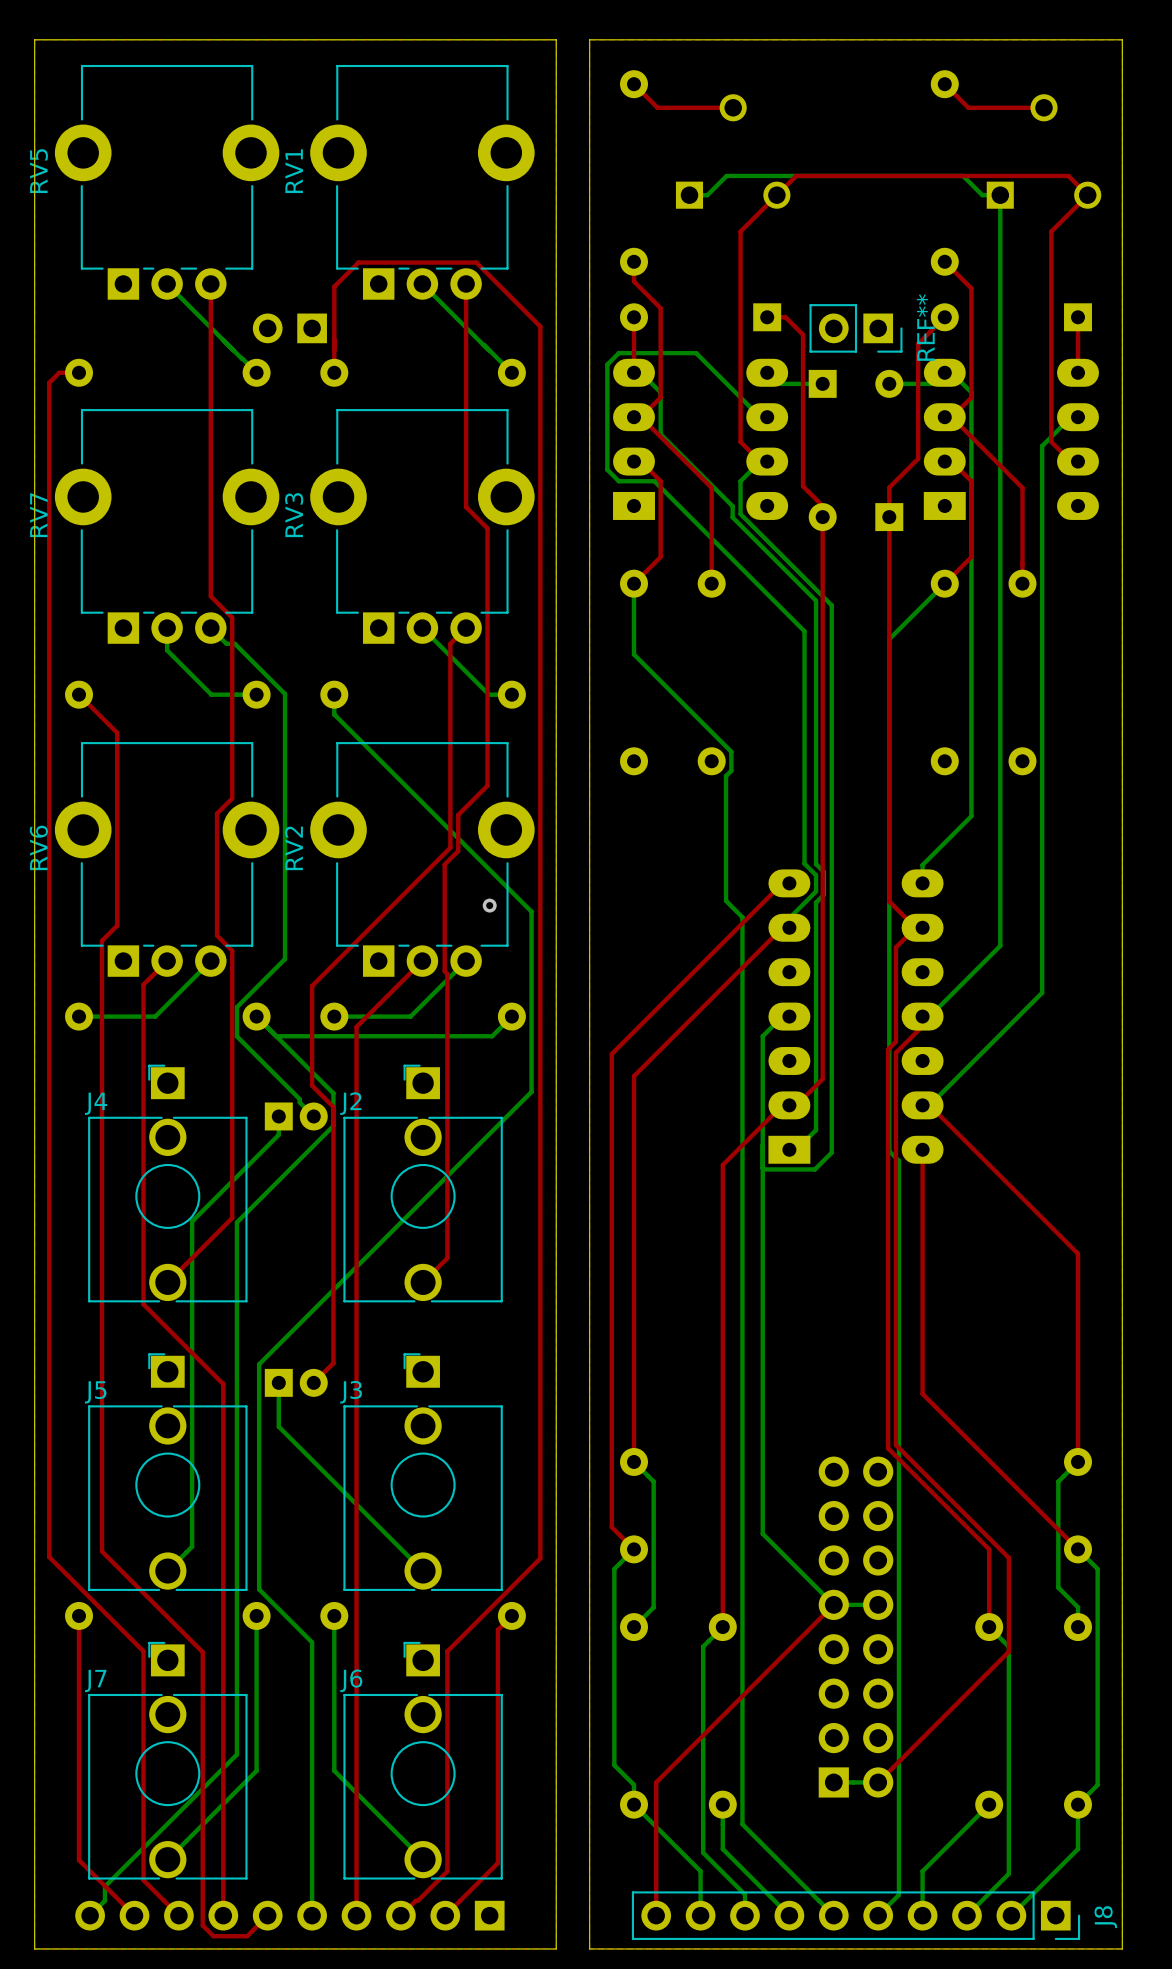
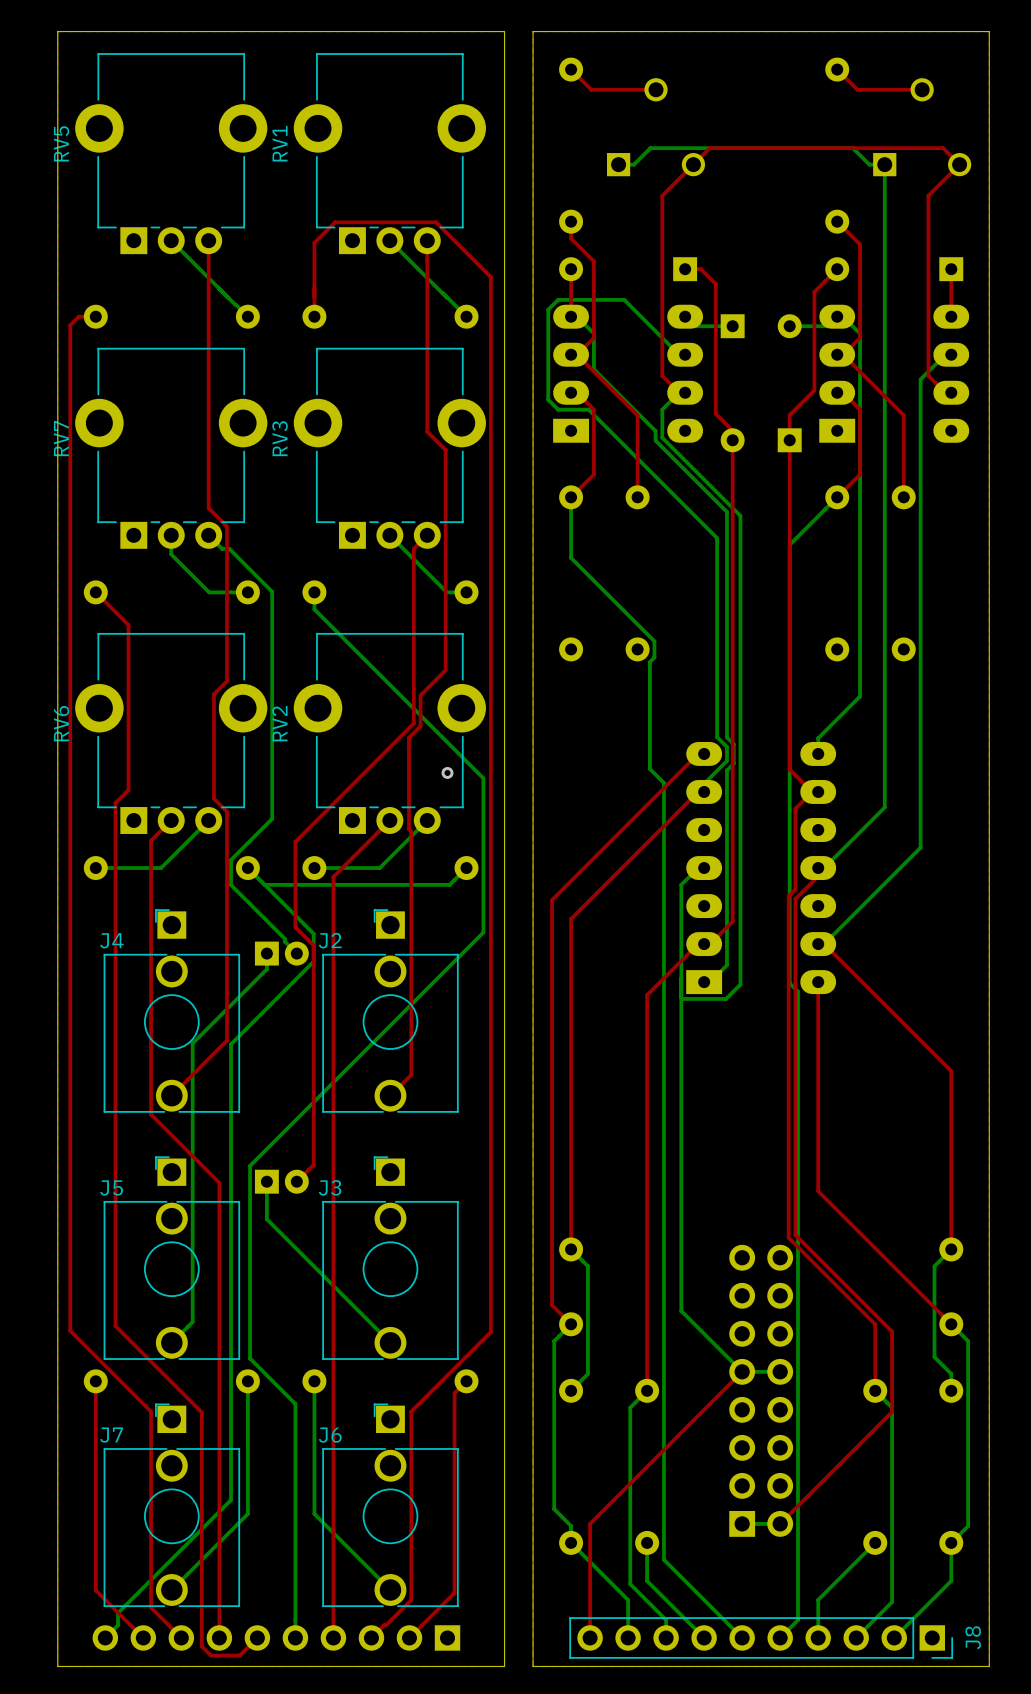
part: (289, 328) -> none
REF**: (855, 328) -> none

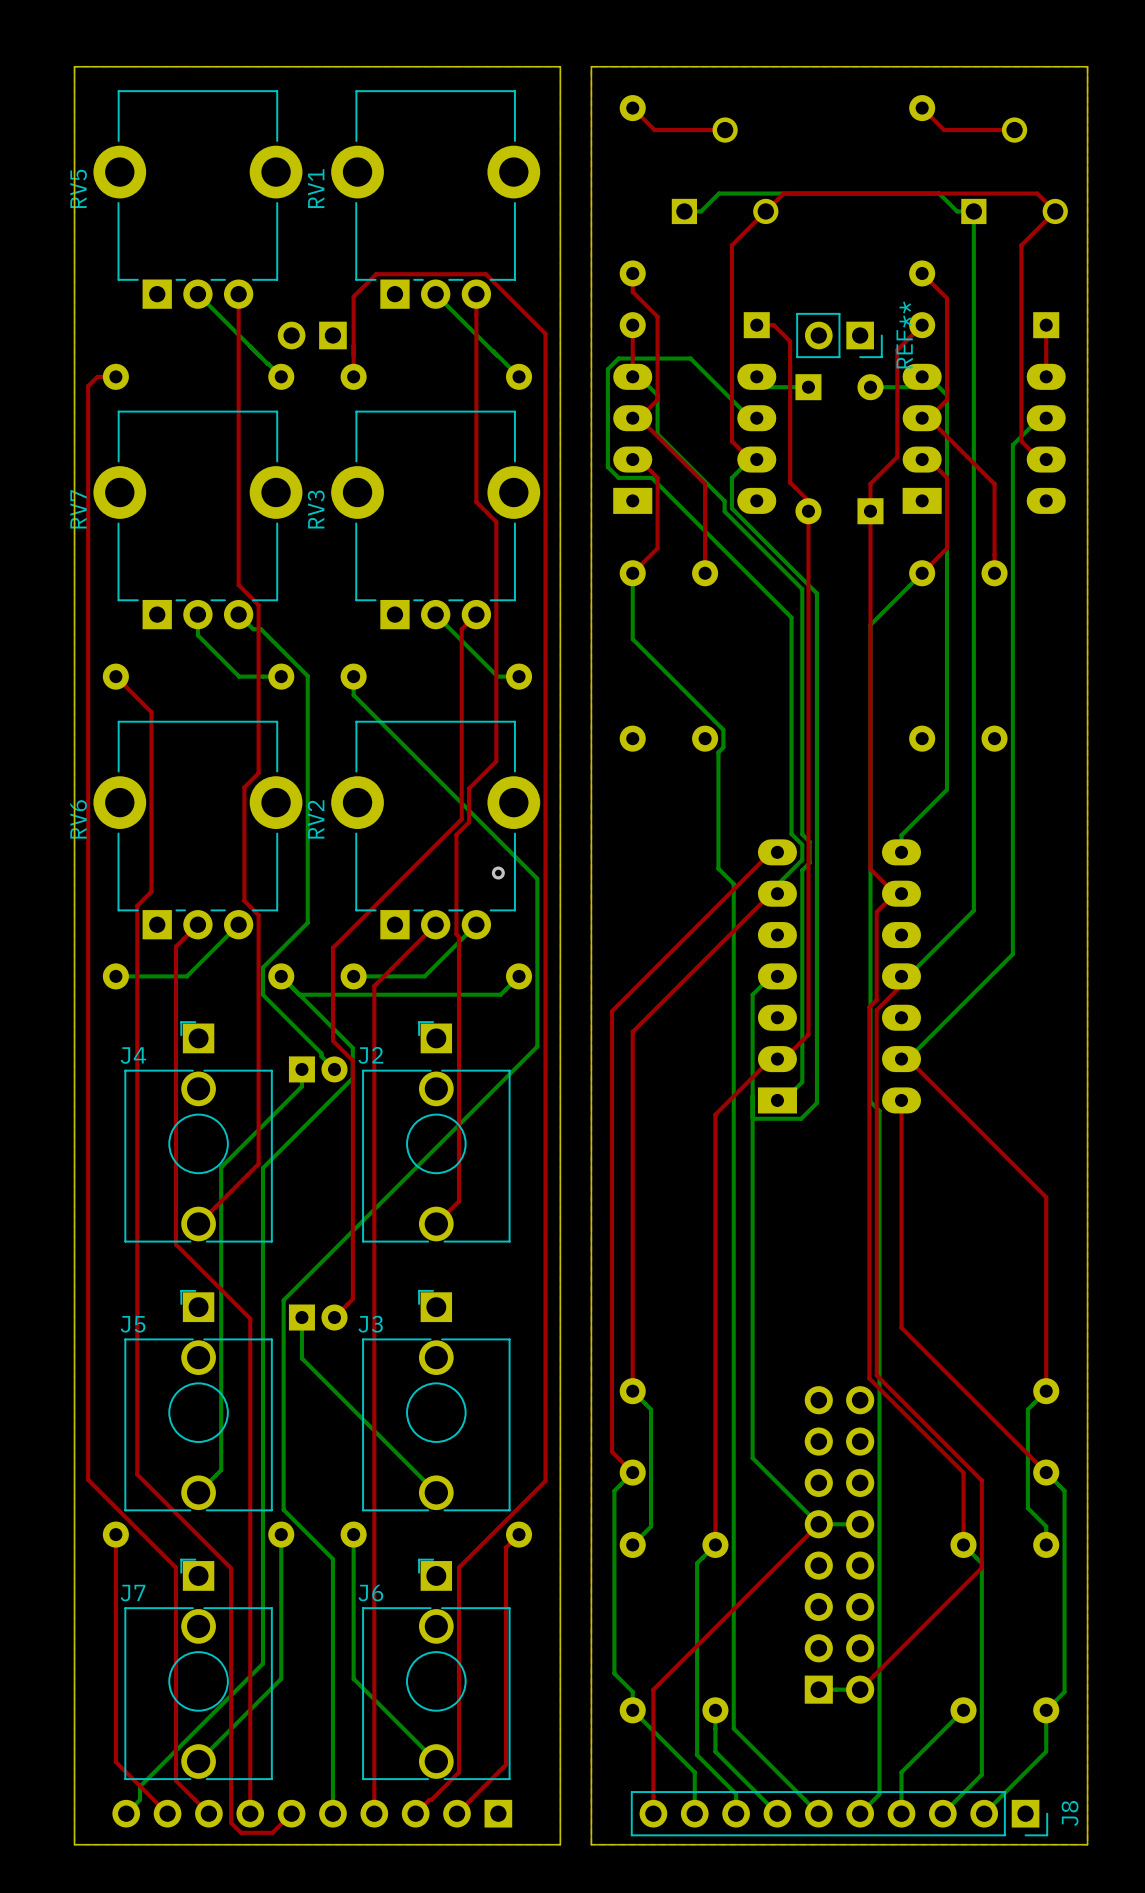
part: none -> (312, 335)
REF**: none -> (839, 335)

